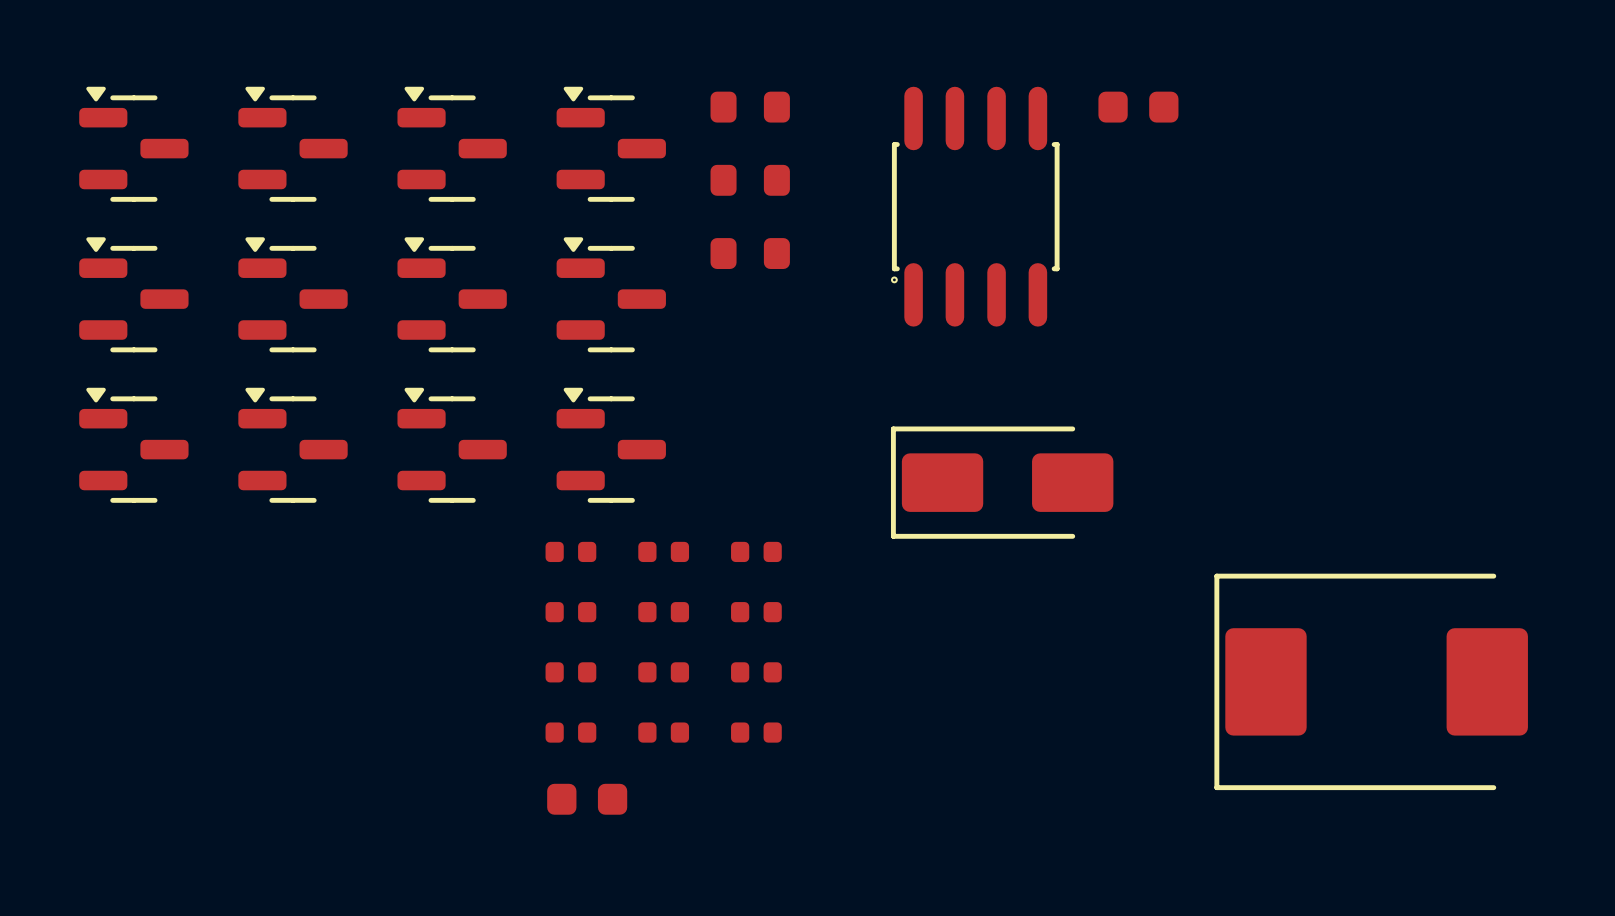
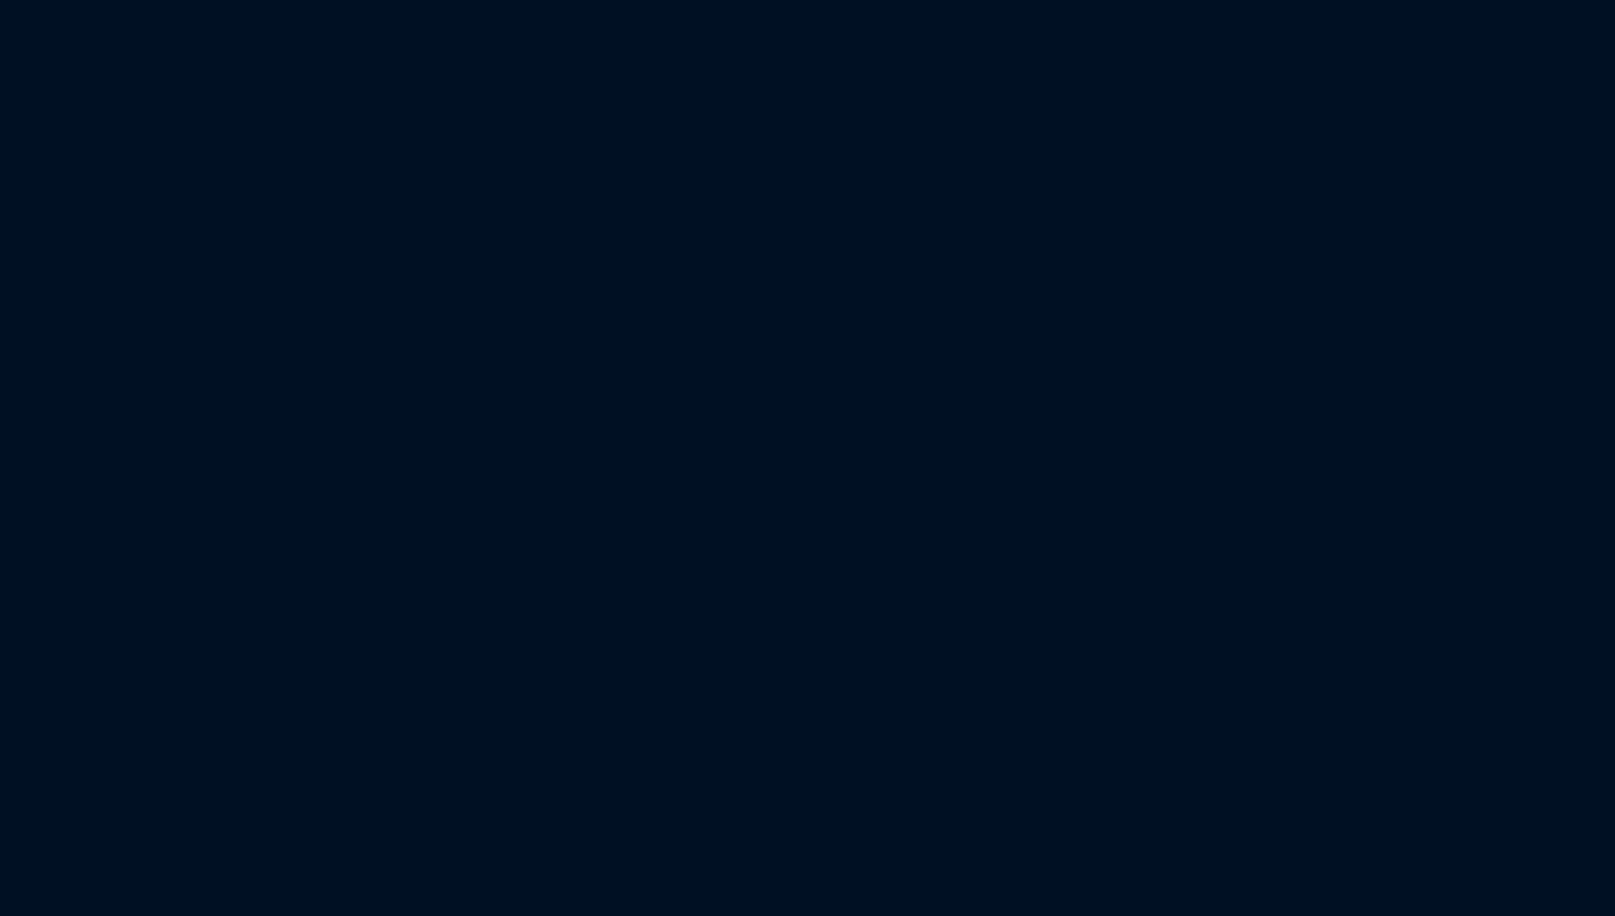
part: (750, 107) -> none
part: (1138, 107) -> none
part: (133, 144) -> none
part: (293, 144) -> none
part: (452, 144) -> none
part: (611, 144) -> none
part: (750, 180) -> none
part: (975, 206) -> none
part: (750, 253) -> none
part: (133, 294) -> none
part: (293, 294) -> none
part: (452, 294) -> none
part: (611, 294) -> none
part: (133, 445) -> none
part: (293, 445) -> none
part: (452, 445) -> none
part: (611, 445) -> none
part: (1002, 482) -> none
part: (570, 551) -> none
part: (663, 551) -> none
part: (756, 551) -> none
part: (570, 612) -> none
part: (663, 612) -> none
part: (756, 612) -> none
part: (570, 672) -> none
part: (663, 672) -> none
part: (756, 672) -> none
part: (1371, 681) -> none
part: (570, 732) -> none
part: (663, 732) -> none
part: (756, 732) -> none
part: (587, 799) -> none

